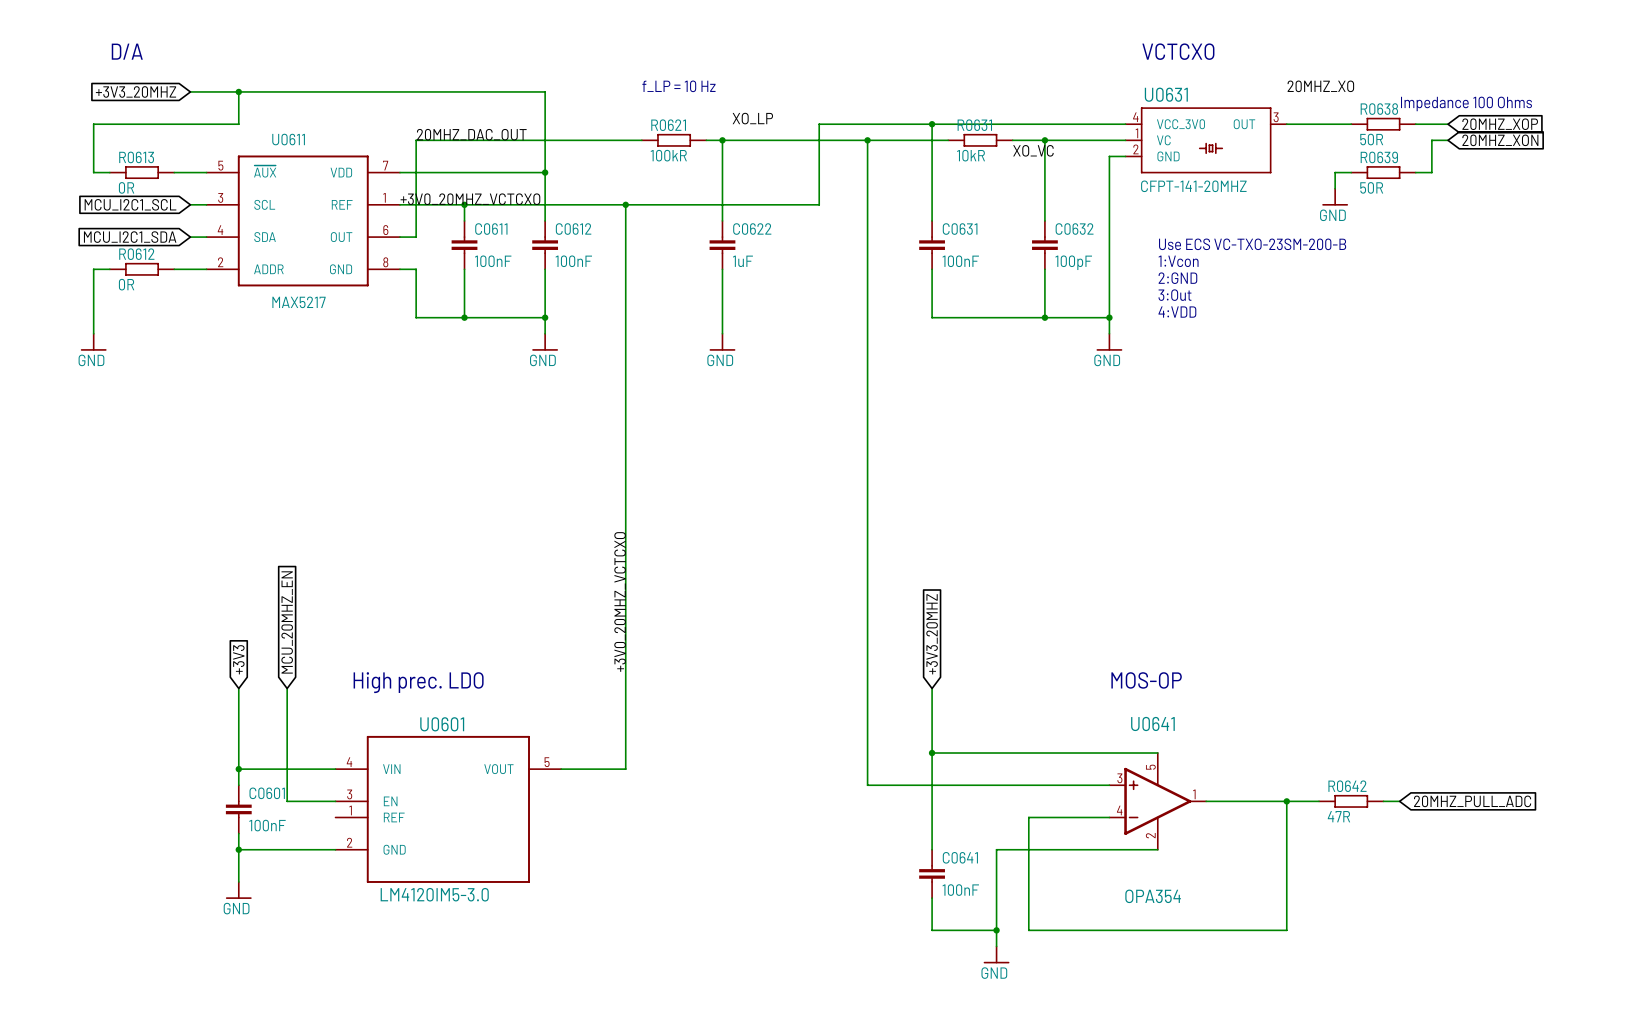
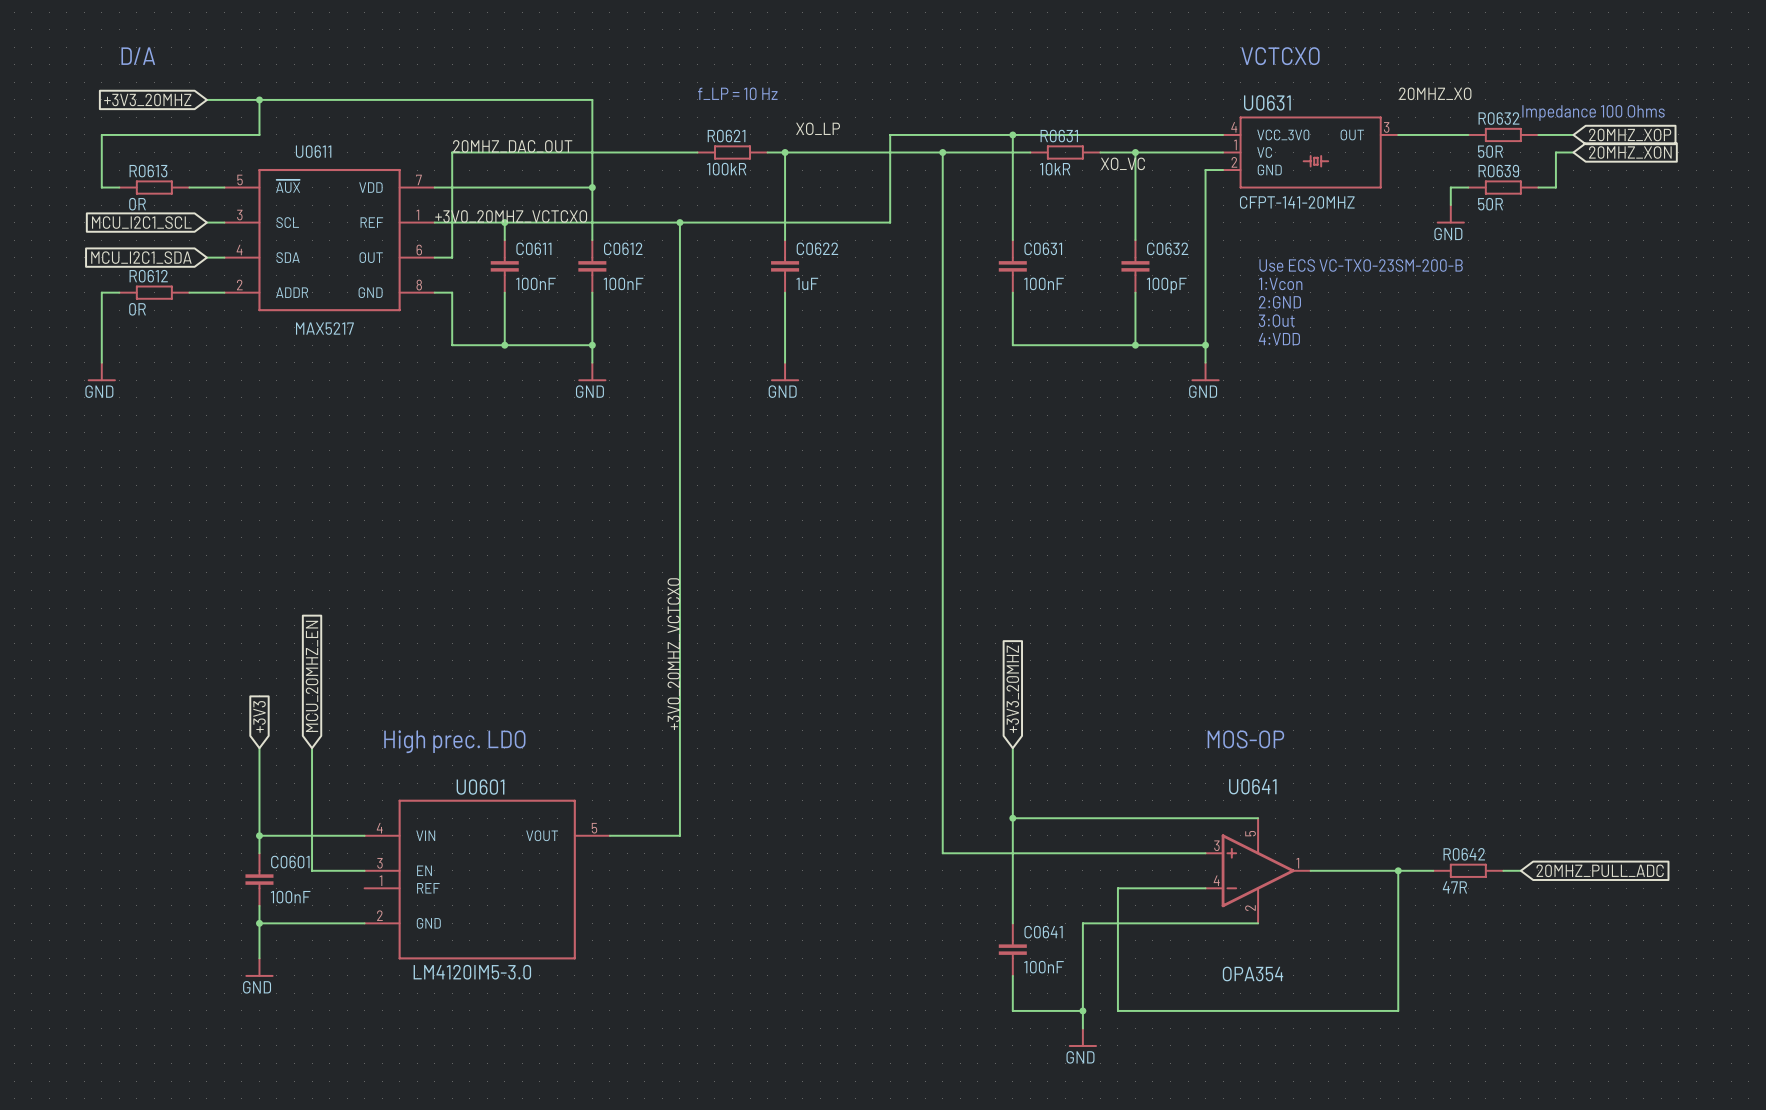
R0638 name: R0638 (1379, 109) -> R0632 (1498, 118)

